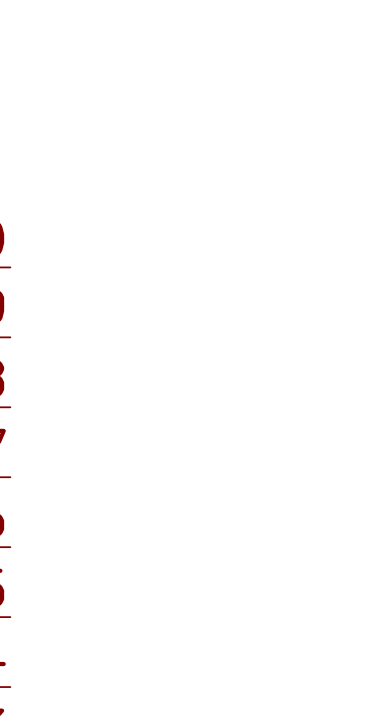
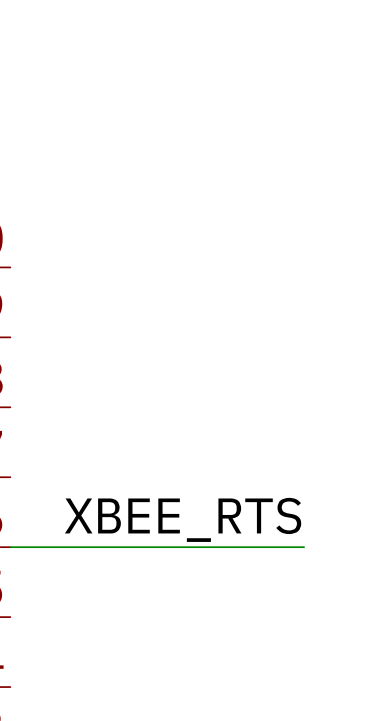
label: none -> XBEE_RTS (183, 519)
wire: none -> (10, 547) (304, 547)

